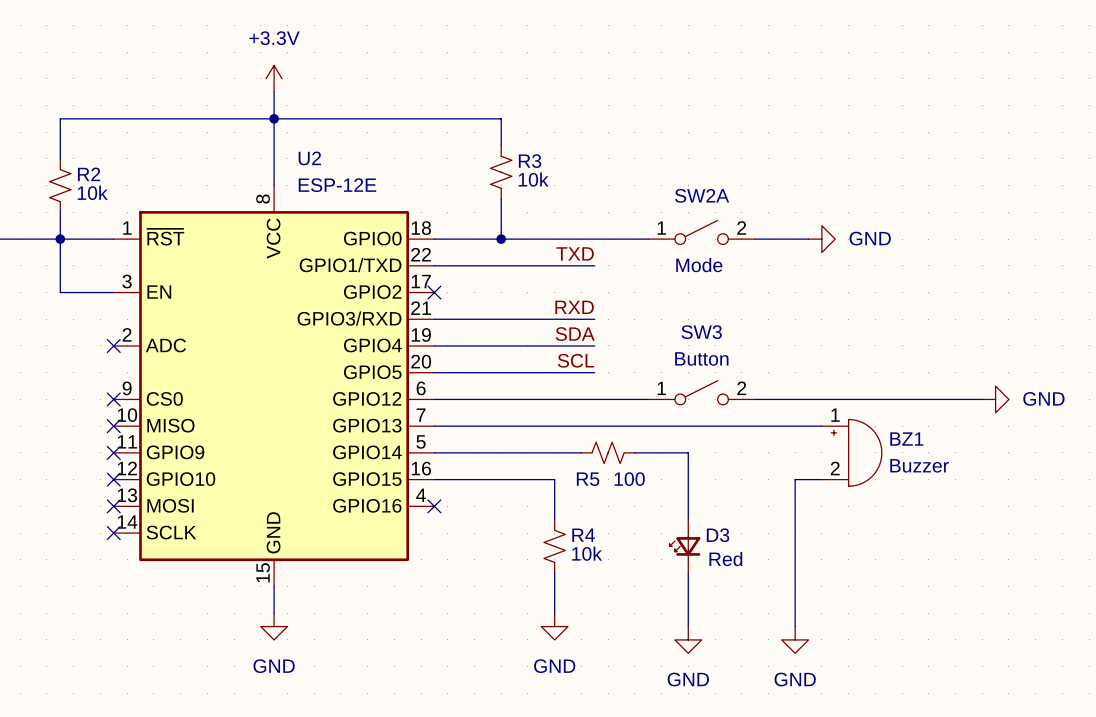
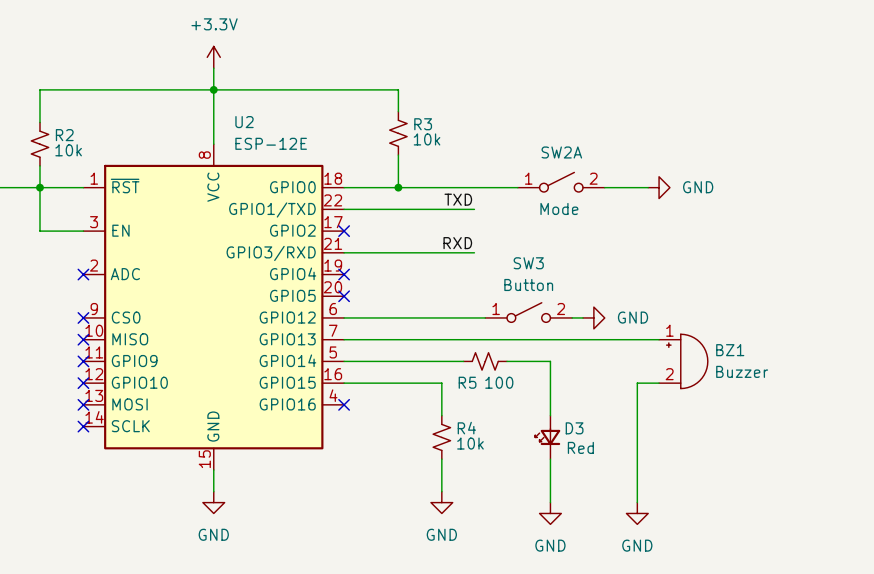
label: SDA (575, 334) -> none
wire: (434, 345) (594, 345) -> none
no-connect mark: none -> (344, 274)
label: SCL (575, 360) -> none
wire: (434, 372) (594, 372) -> none
no-connect mark: none -> (344, 296)
SW3 position: (701, 392) -> (528, 312)
wire: none -> (572, 317) (583, 317)
wire: (755, 399) (982, 399) -> none
power symbol position: GND (995, 399) -> GND (593, 317)

